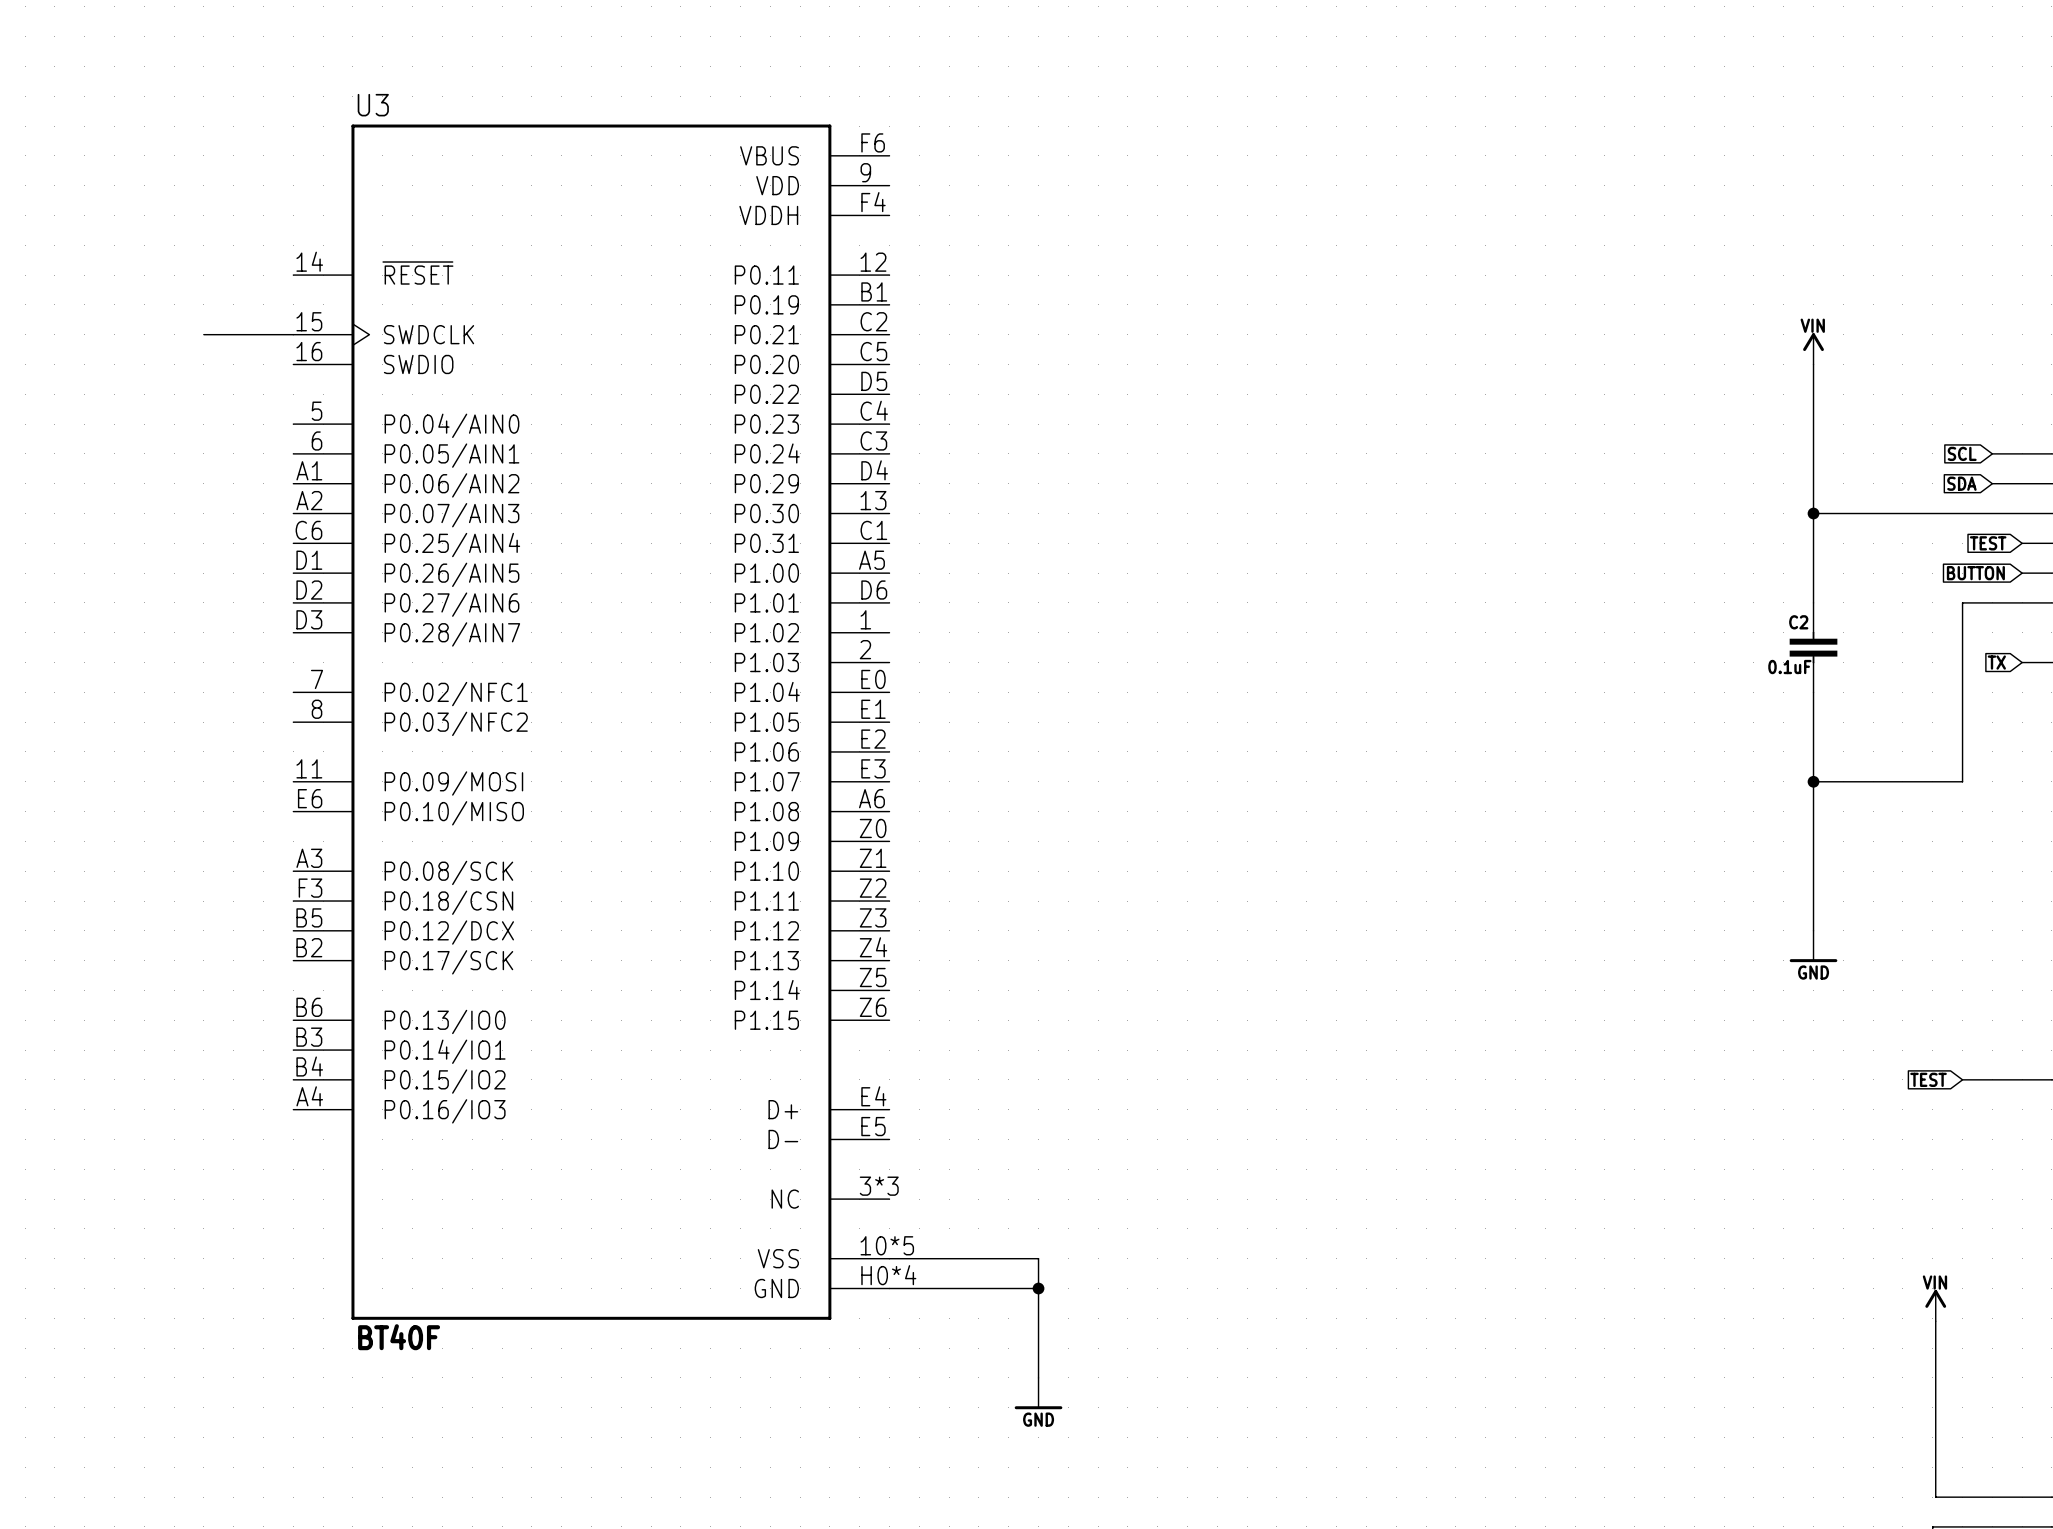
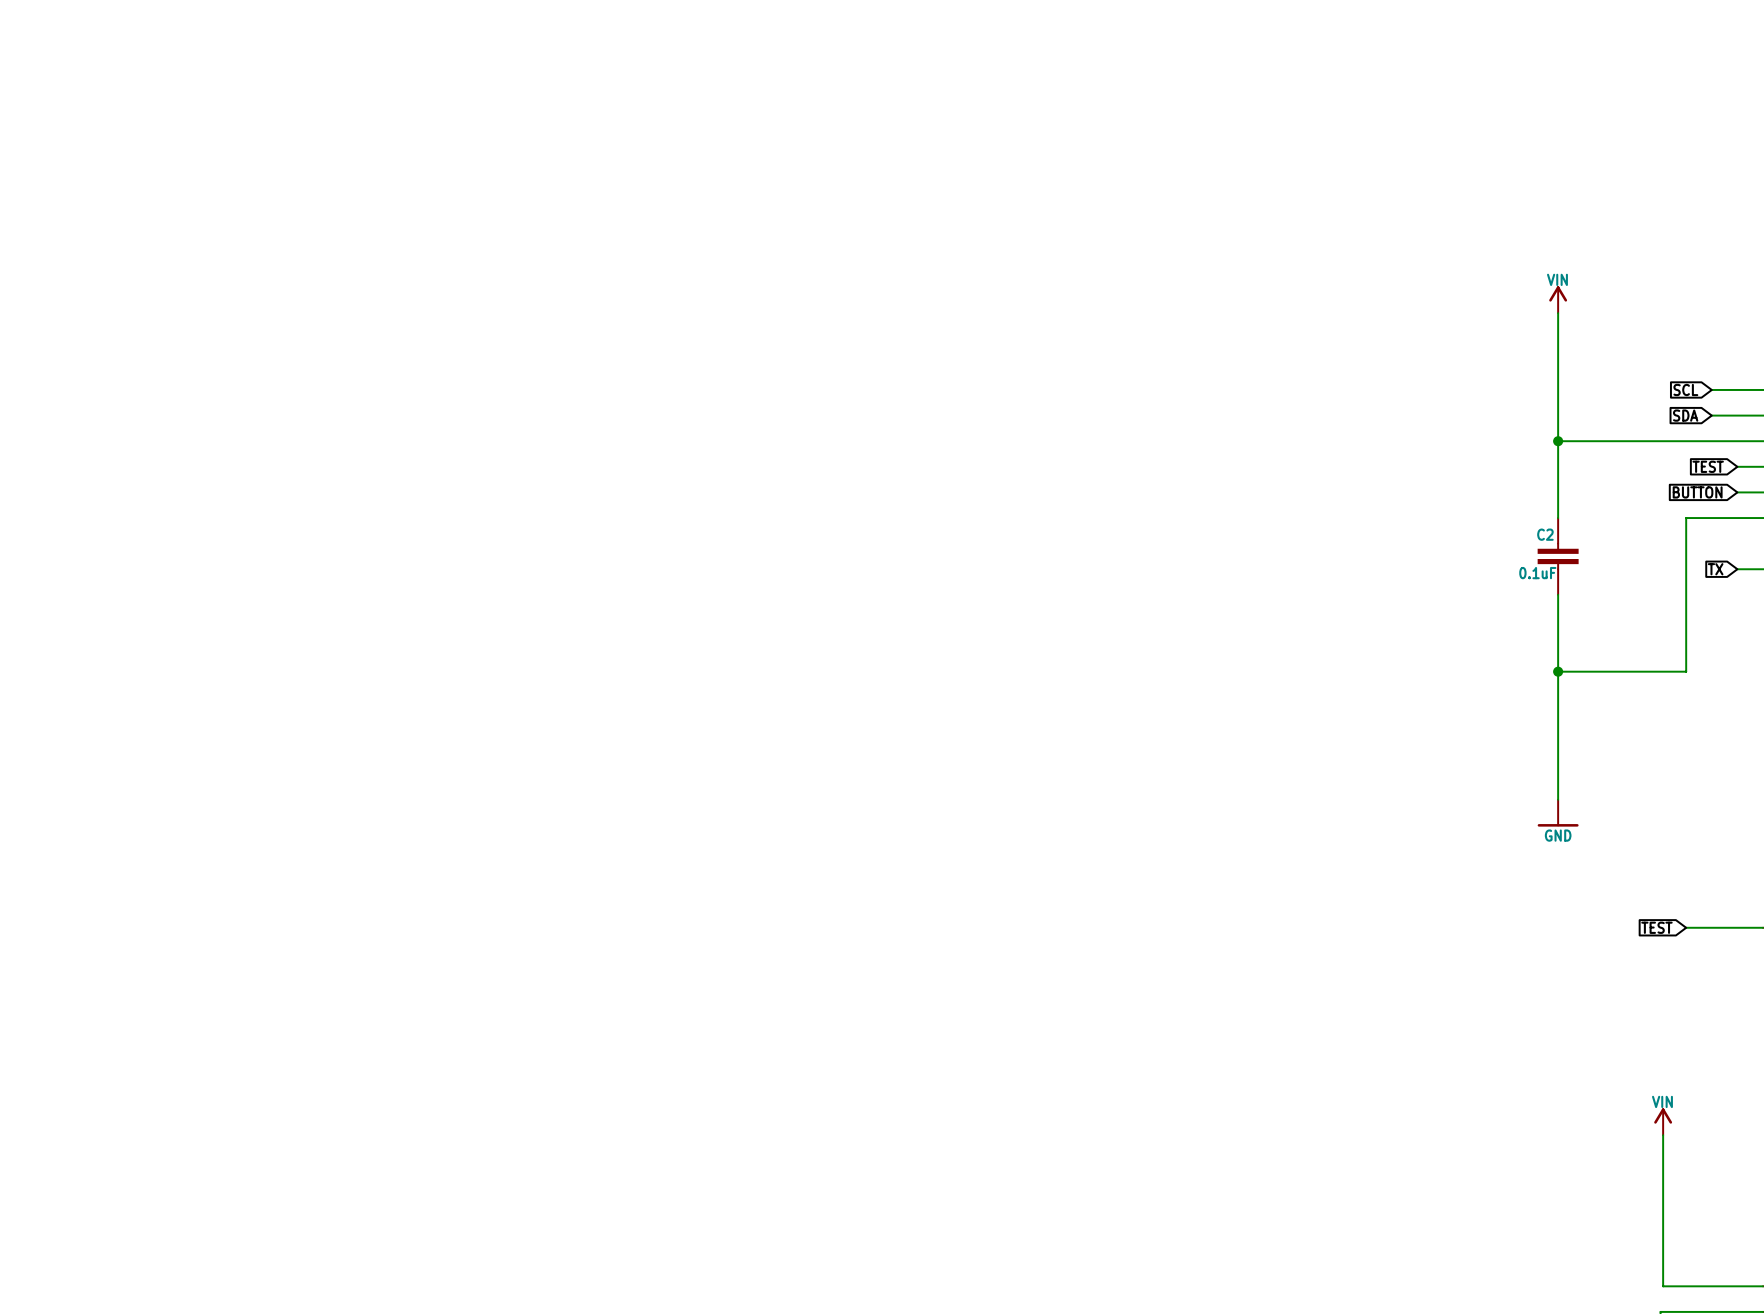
wire: (203, 334) (293, 334) -> none
U3: BT40F (591, 722) -> none
wire: (889, 1258) (1038, 1258) (1038, 1377) -> none
wire: (889, 1288) (1038, 1288) -> none
junction: (1038, 1288) -> none
power symbol: GND (1038, 1393) -> none

